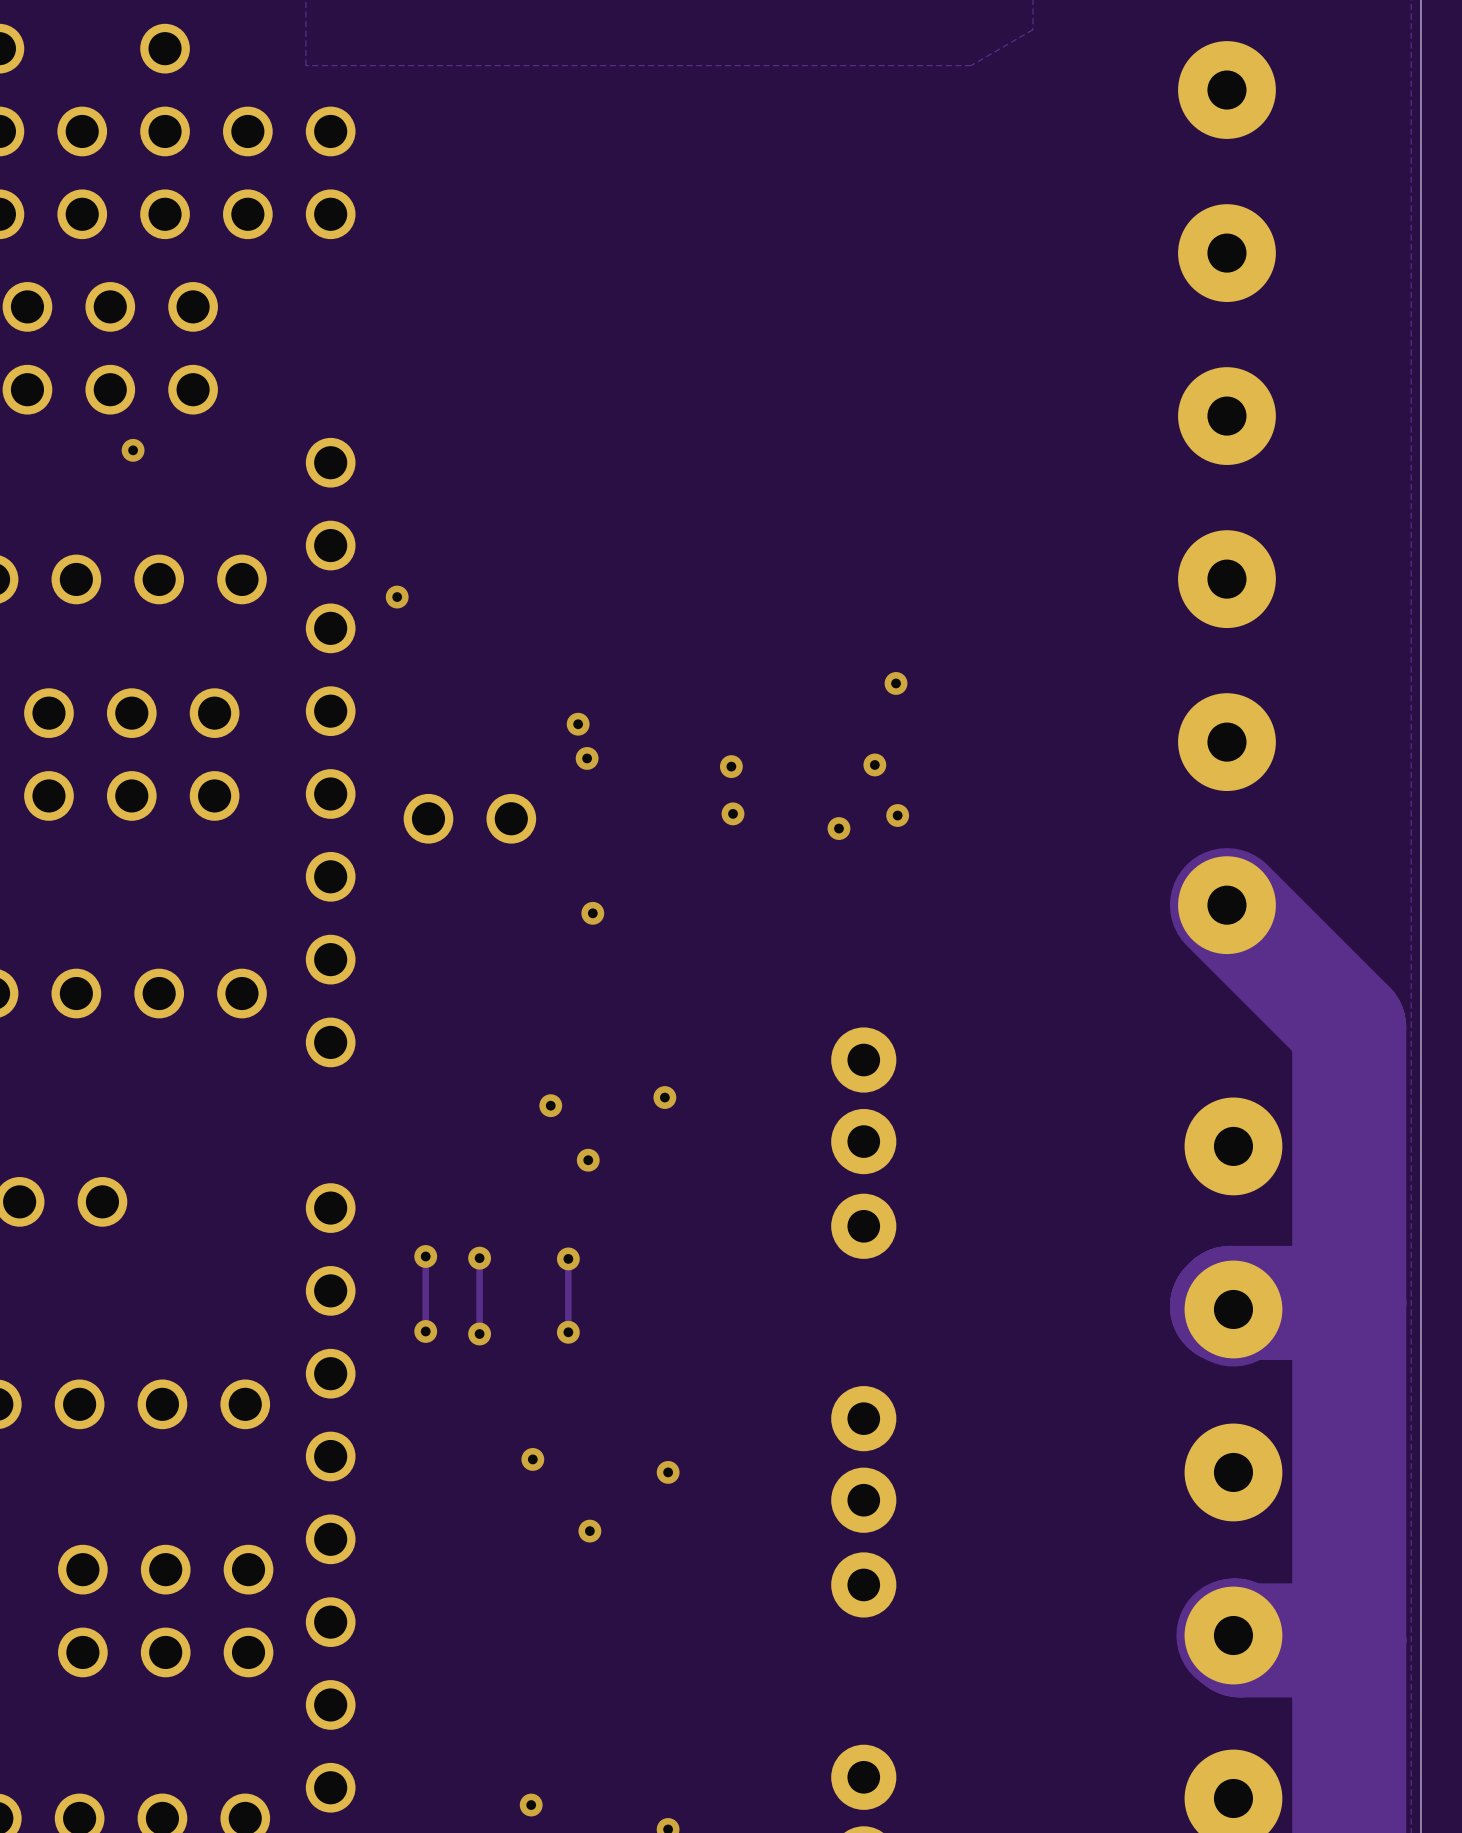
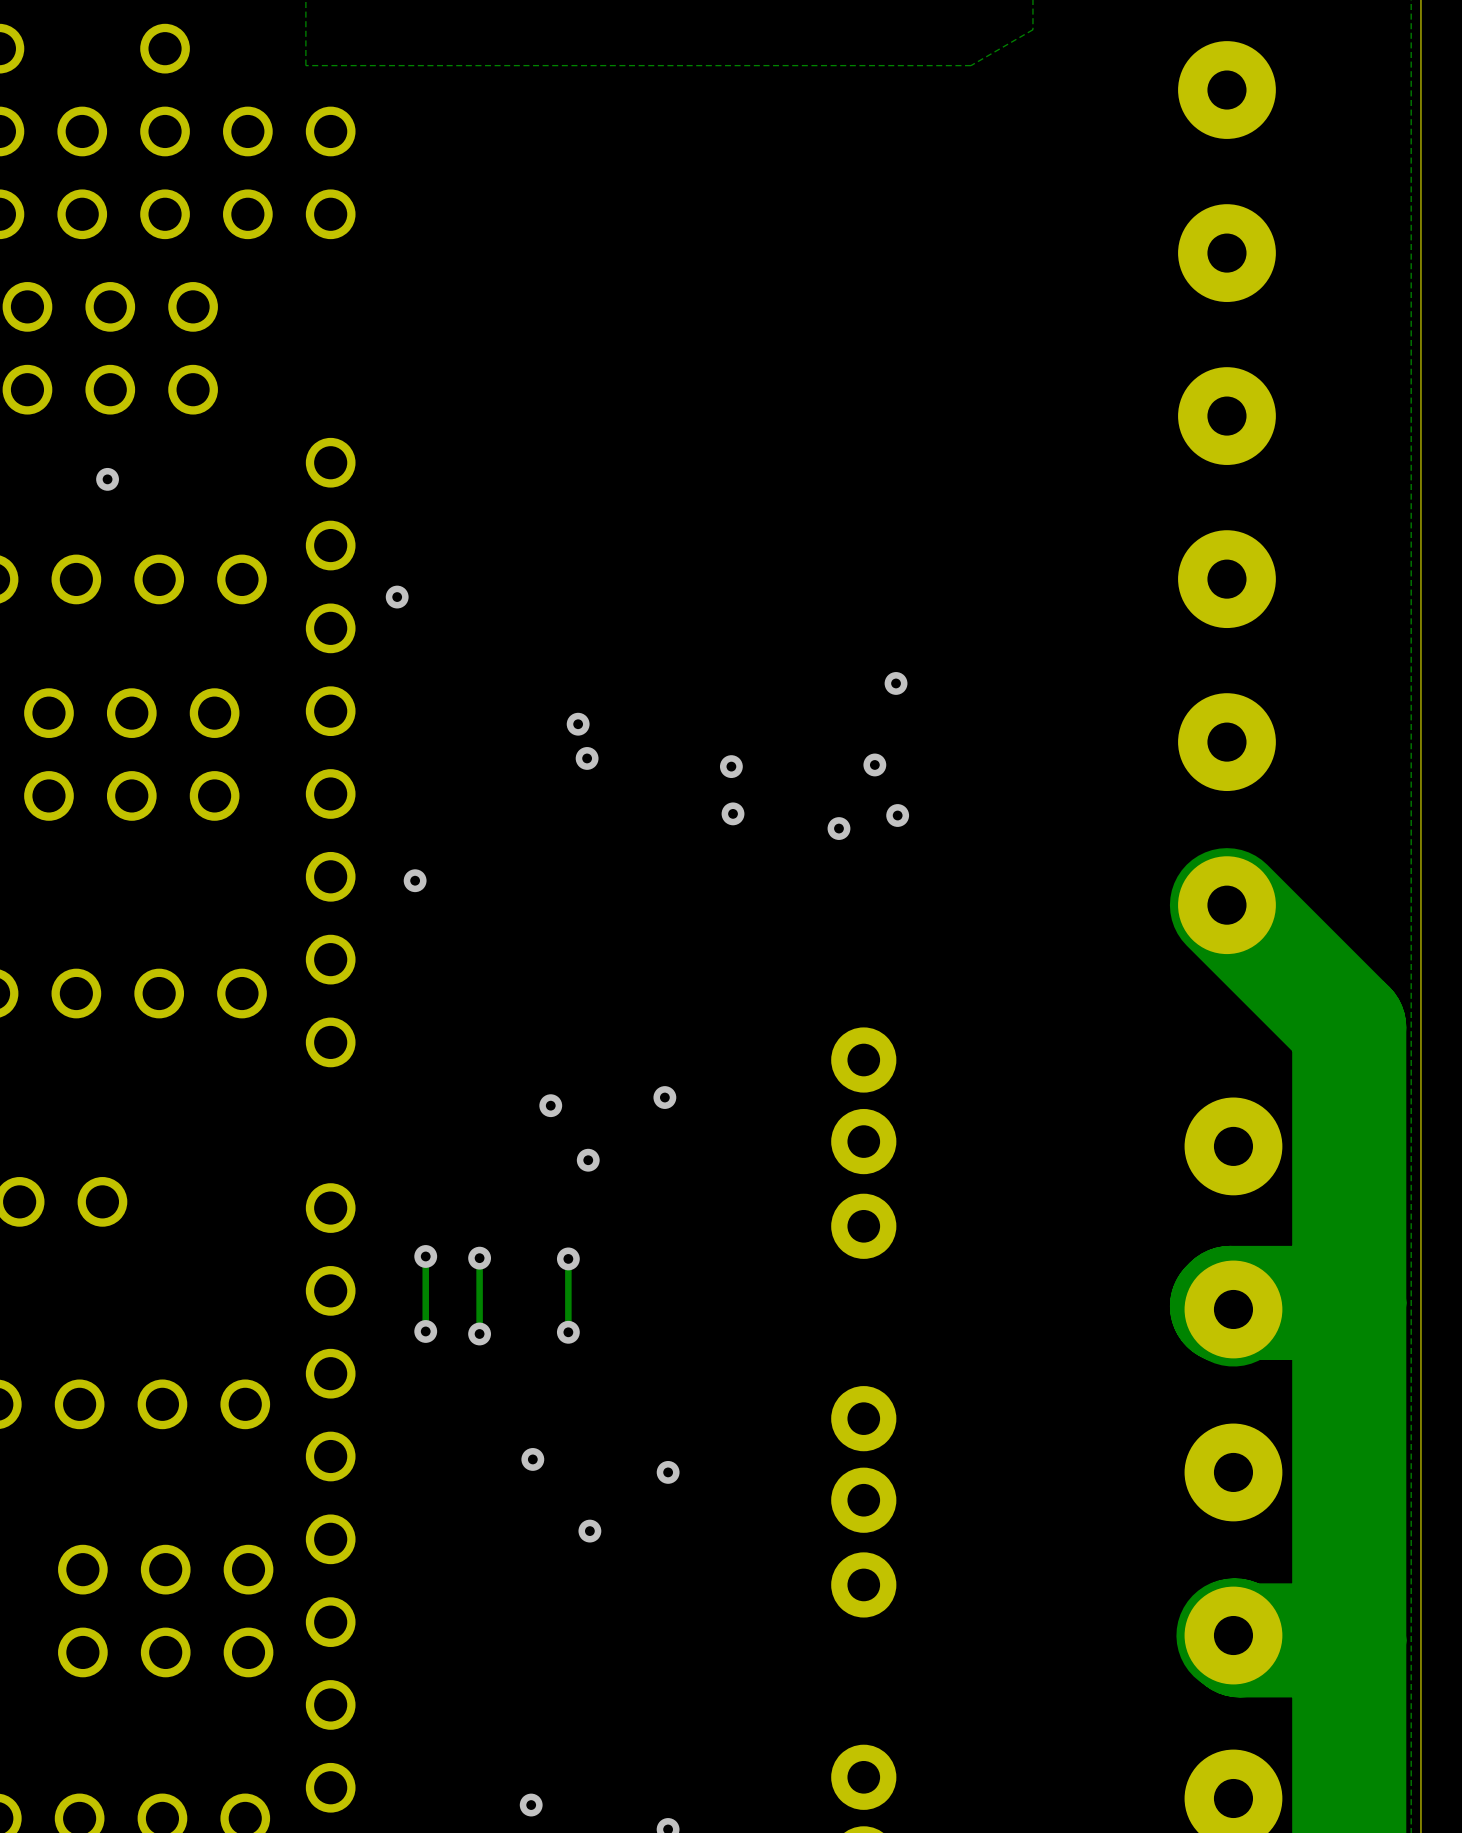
via position: (133, 450) -> (107, 479)
part: (469, 818) -> none
via position: (592, 913) -> (415, 880)

